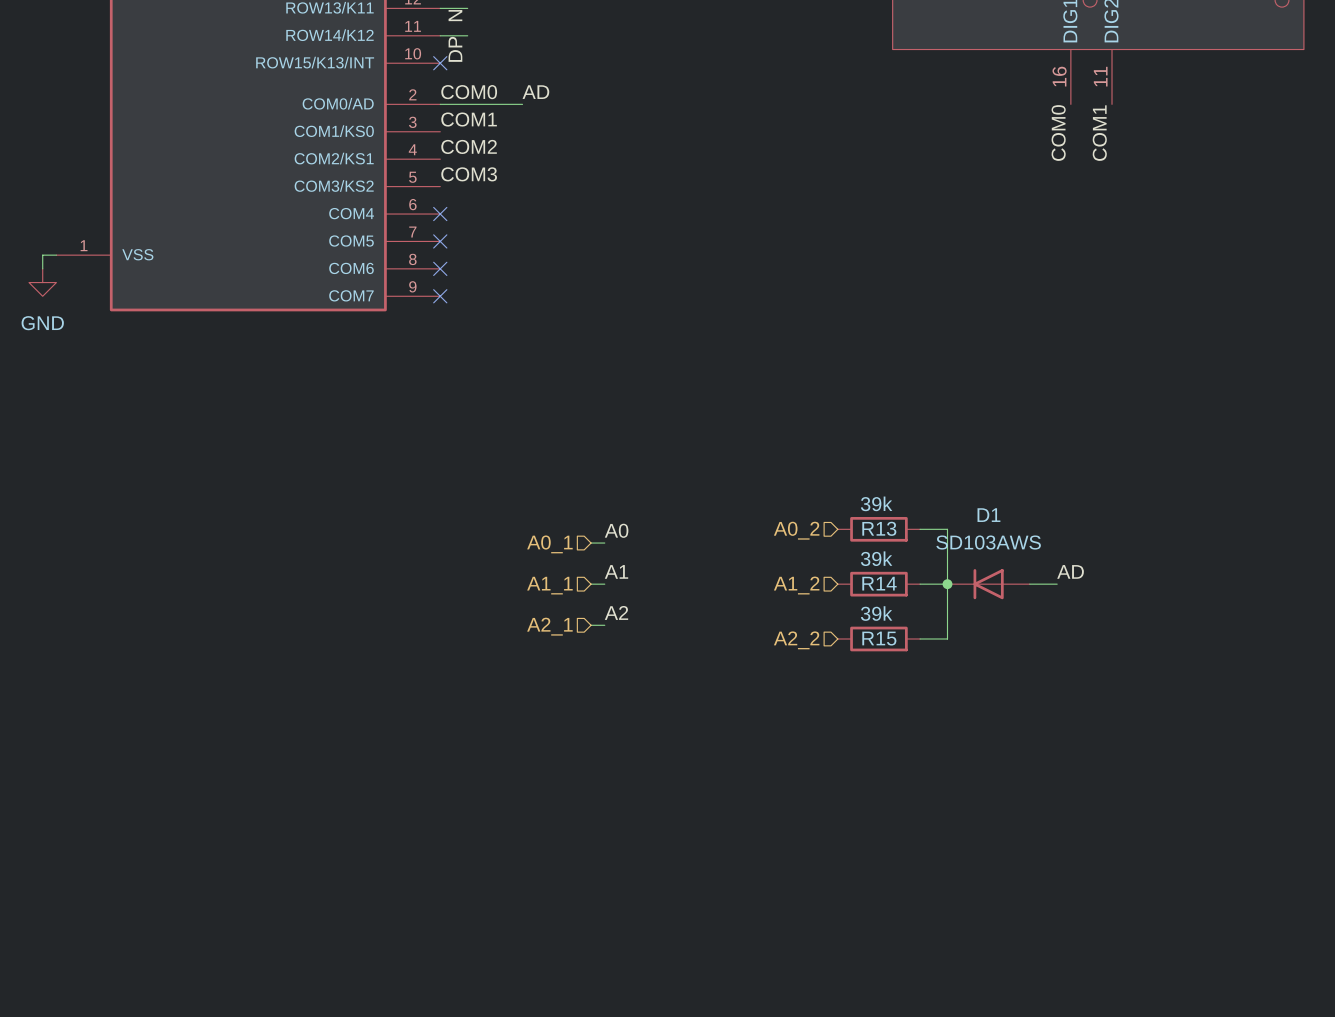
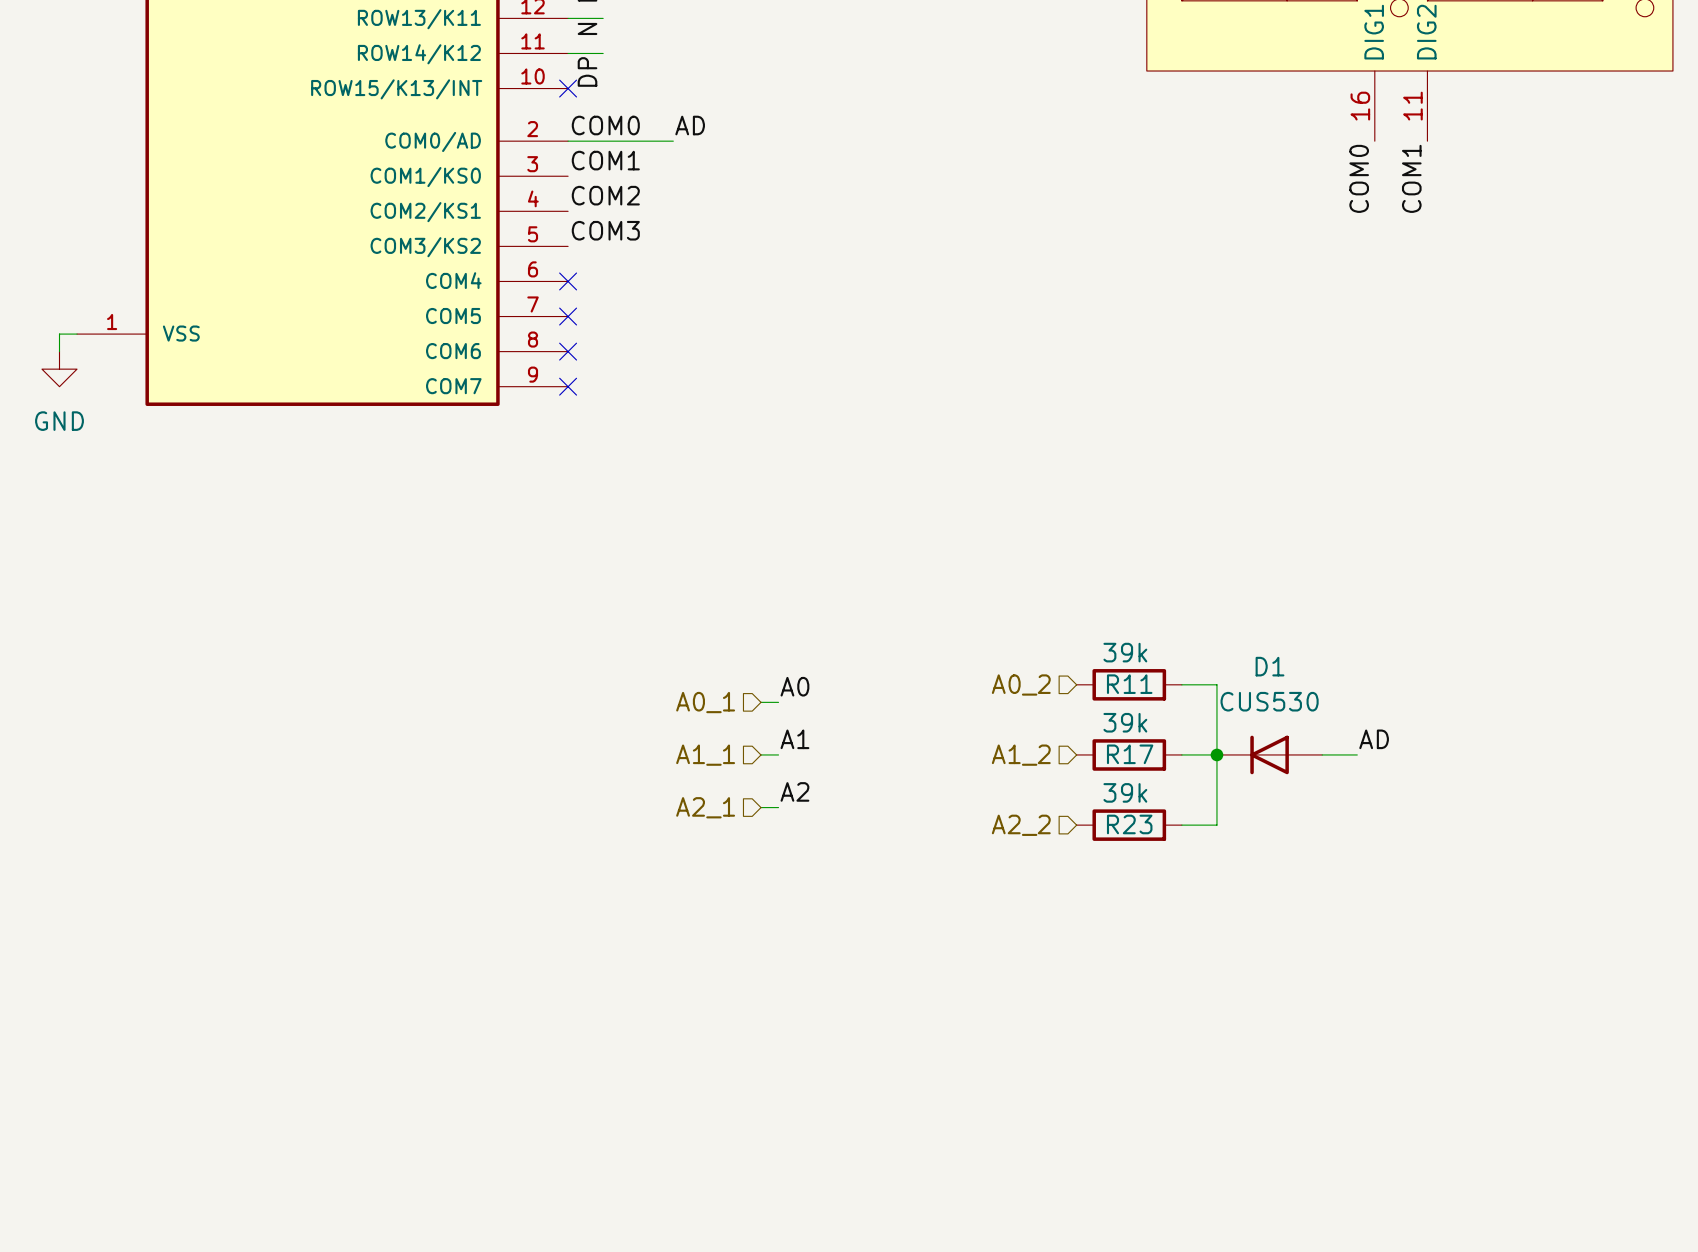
R13 name: R13 (879, 528) -> R11 (1129, 684)
D1 value: SD103AWS (988, 542) -> CUS530 (1269, 701)
R14 name: R14 (879, 583) -> R17 (1130, 754)
R15 name: R15 (879, 638) -> R23 (1129, 824)

